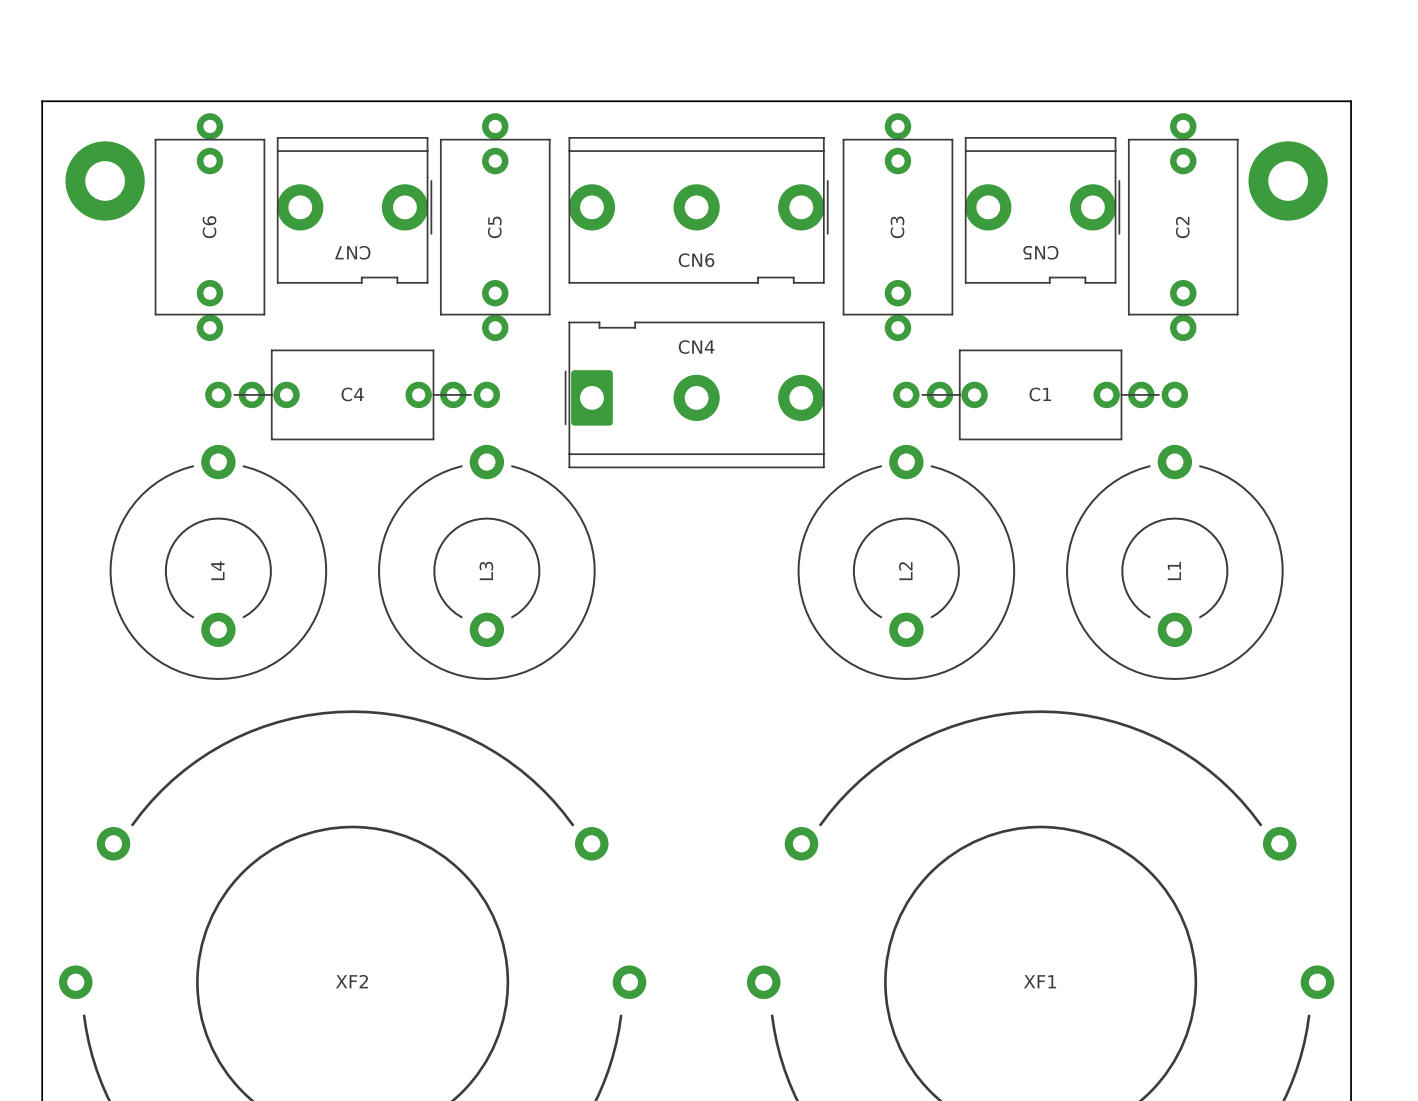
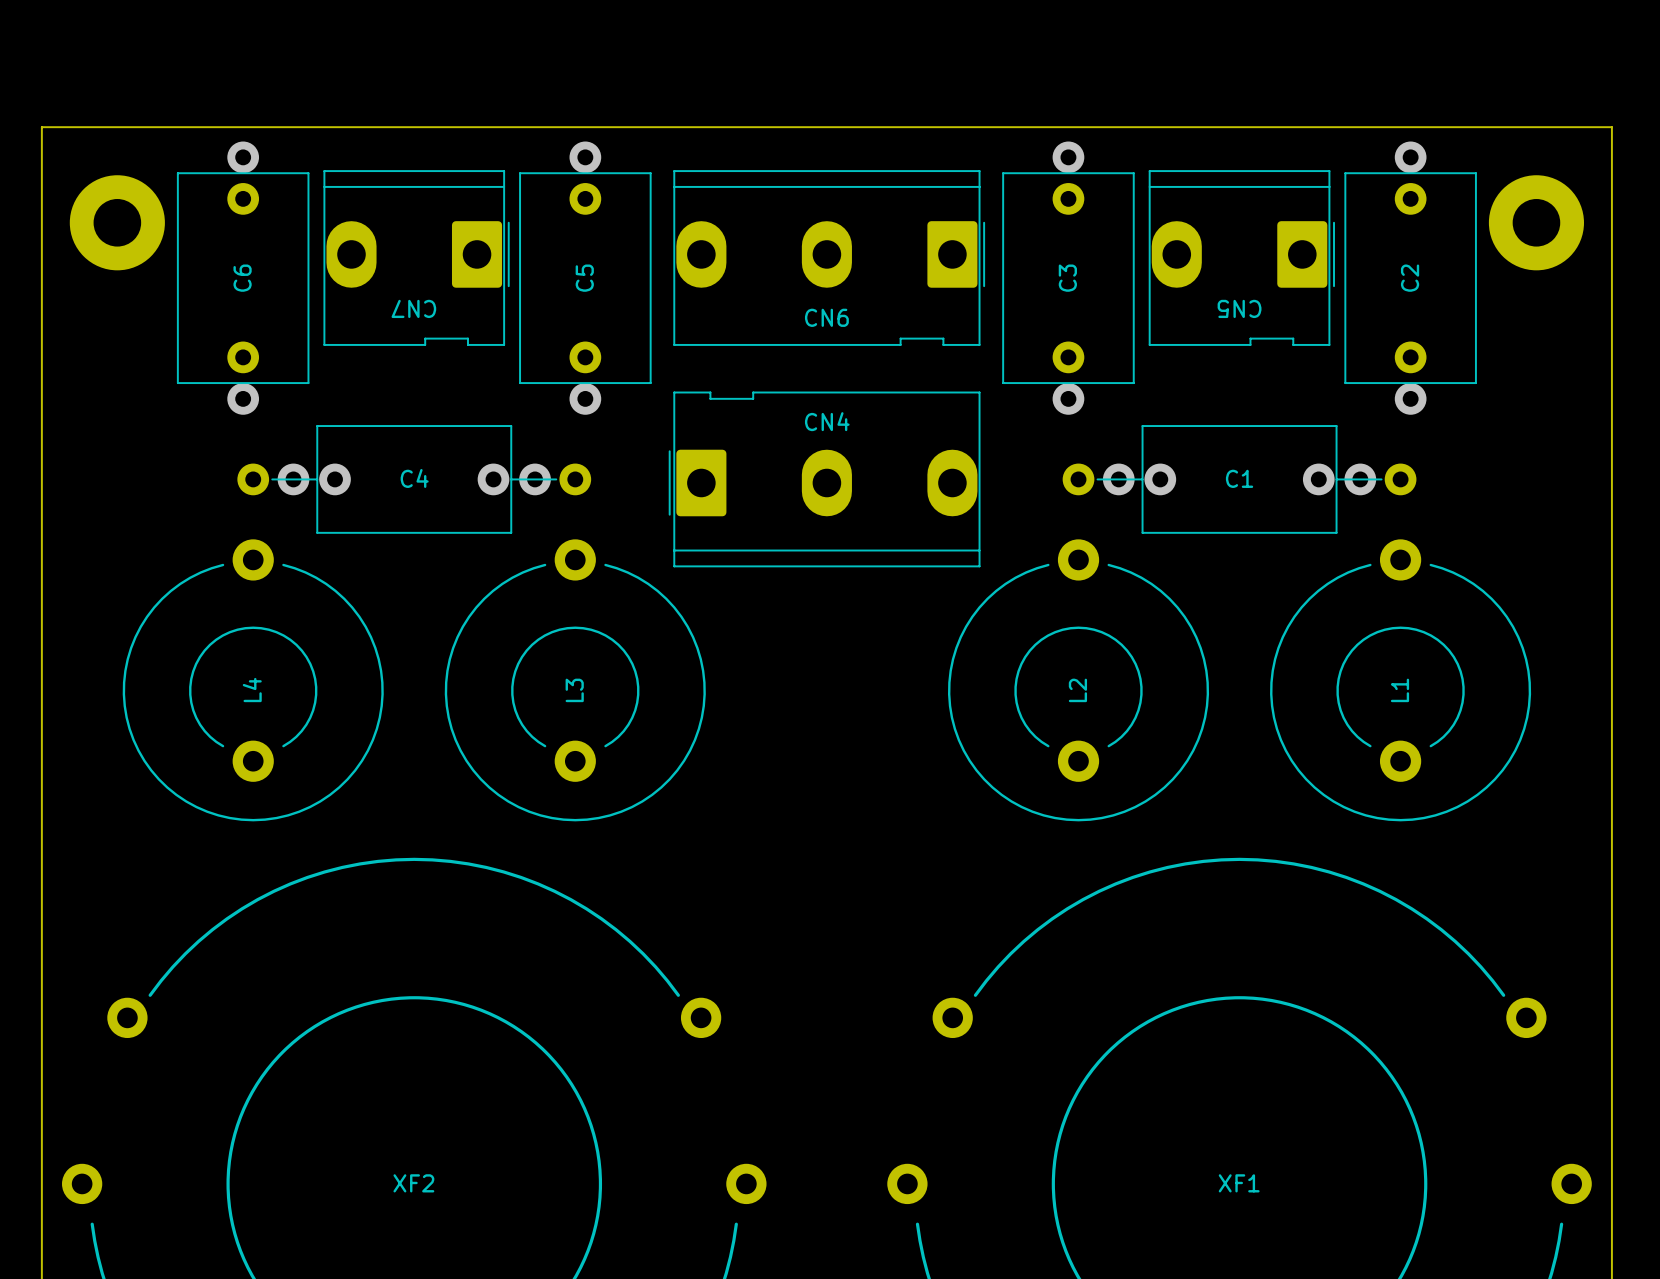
CN7 footprint: [276, 137, 433, 284] -> [323, 170, 510, 346]
CN6 footprint: [568, 137, 829, 284] -> [673, 170, 986, 346]
CN5 footprint: [964, 137, 1121, 284] -> [1148, 170, 1335, 346]
CN4 footprint: [564, 321, 825, 469] -> [668, 391, 981, 568]

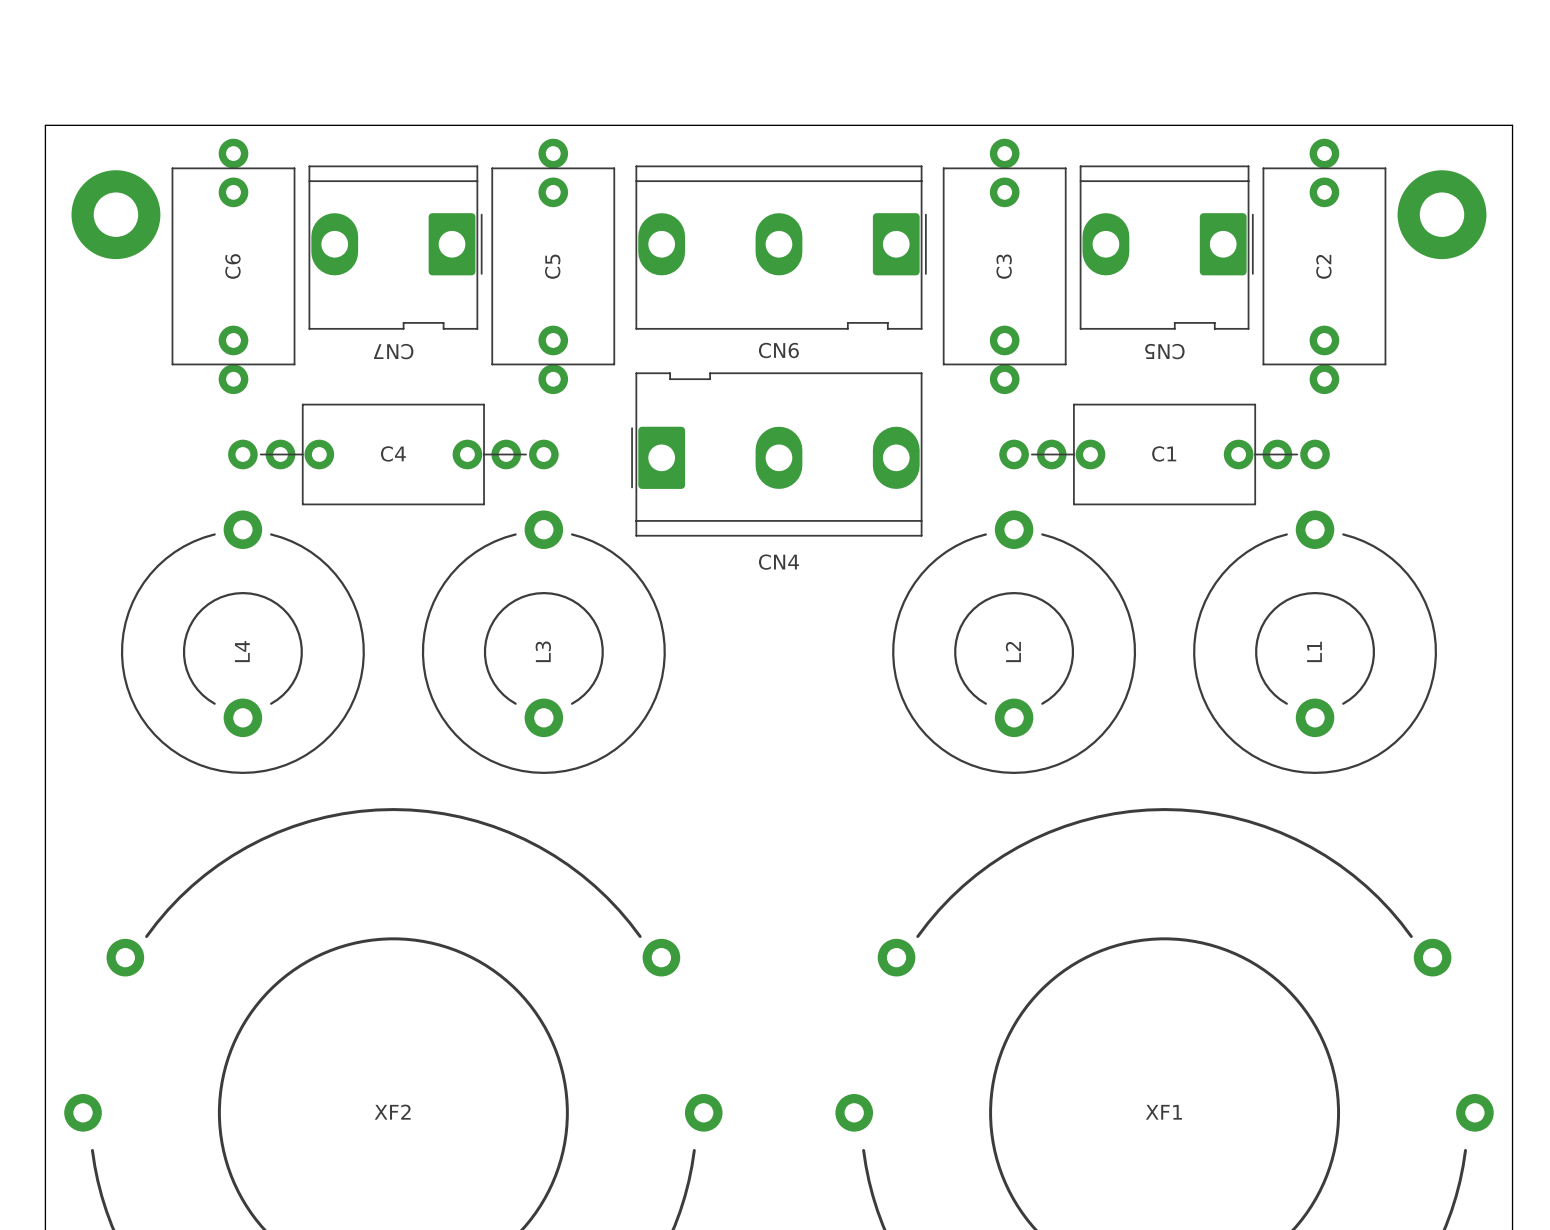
CN7 name position: CN7 (413, 308) -> CN7 (393, 351)
CN5 name position: CN5 (1239, 308) -> CN5 (1164, 351)
CN6 name position: CN6 (826, 317) -> CN6 (778, 350)
CN4 name position: CN4 (827, 421) -> CN4 (778, 562)

